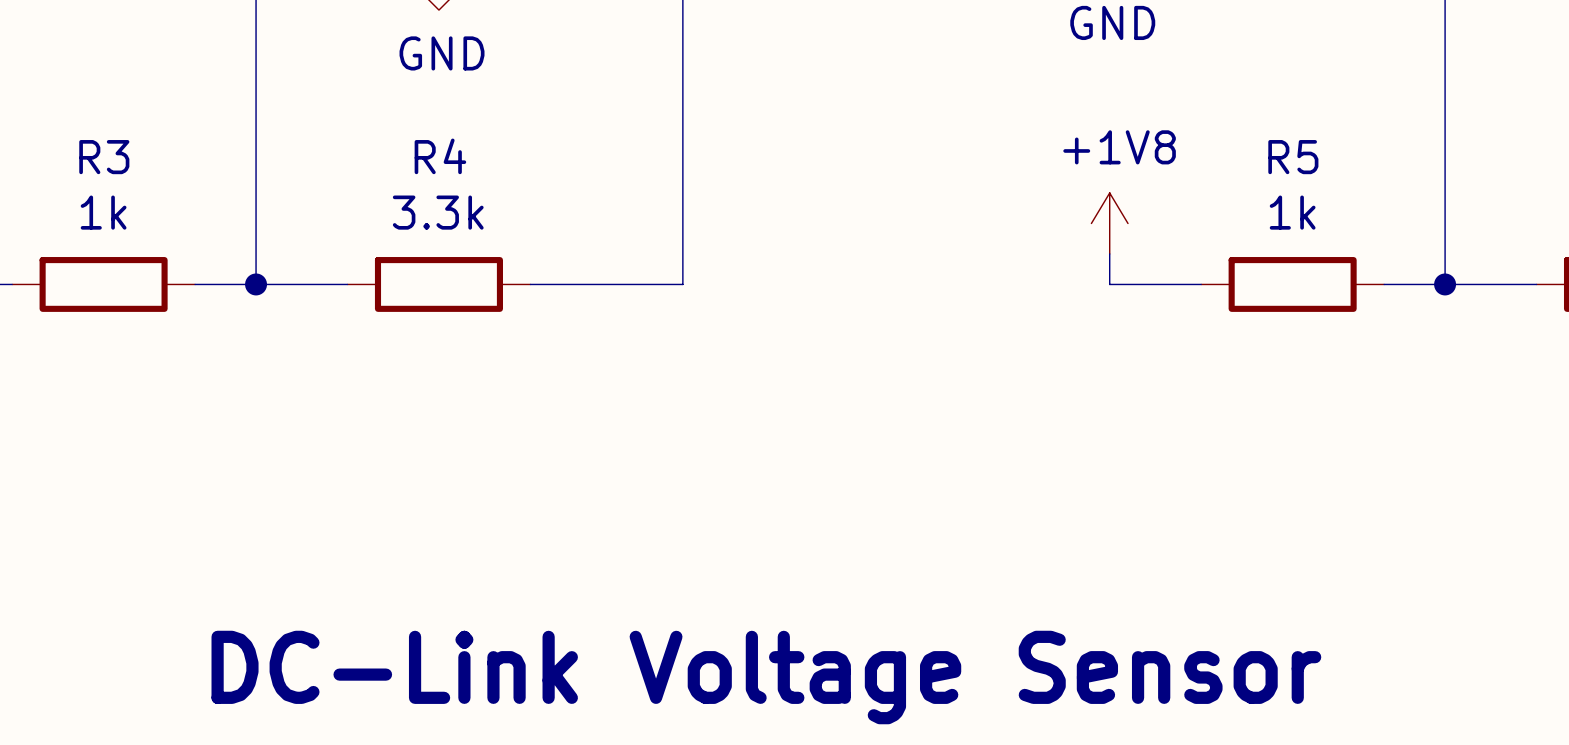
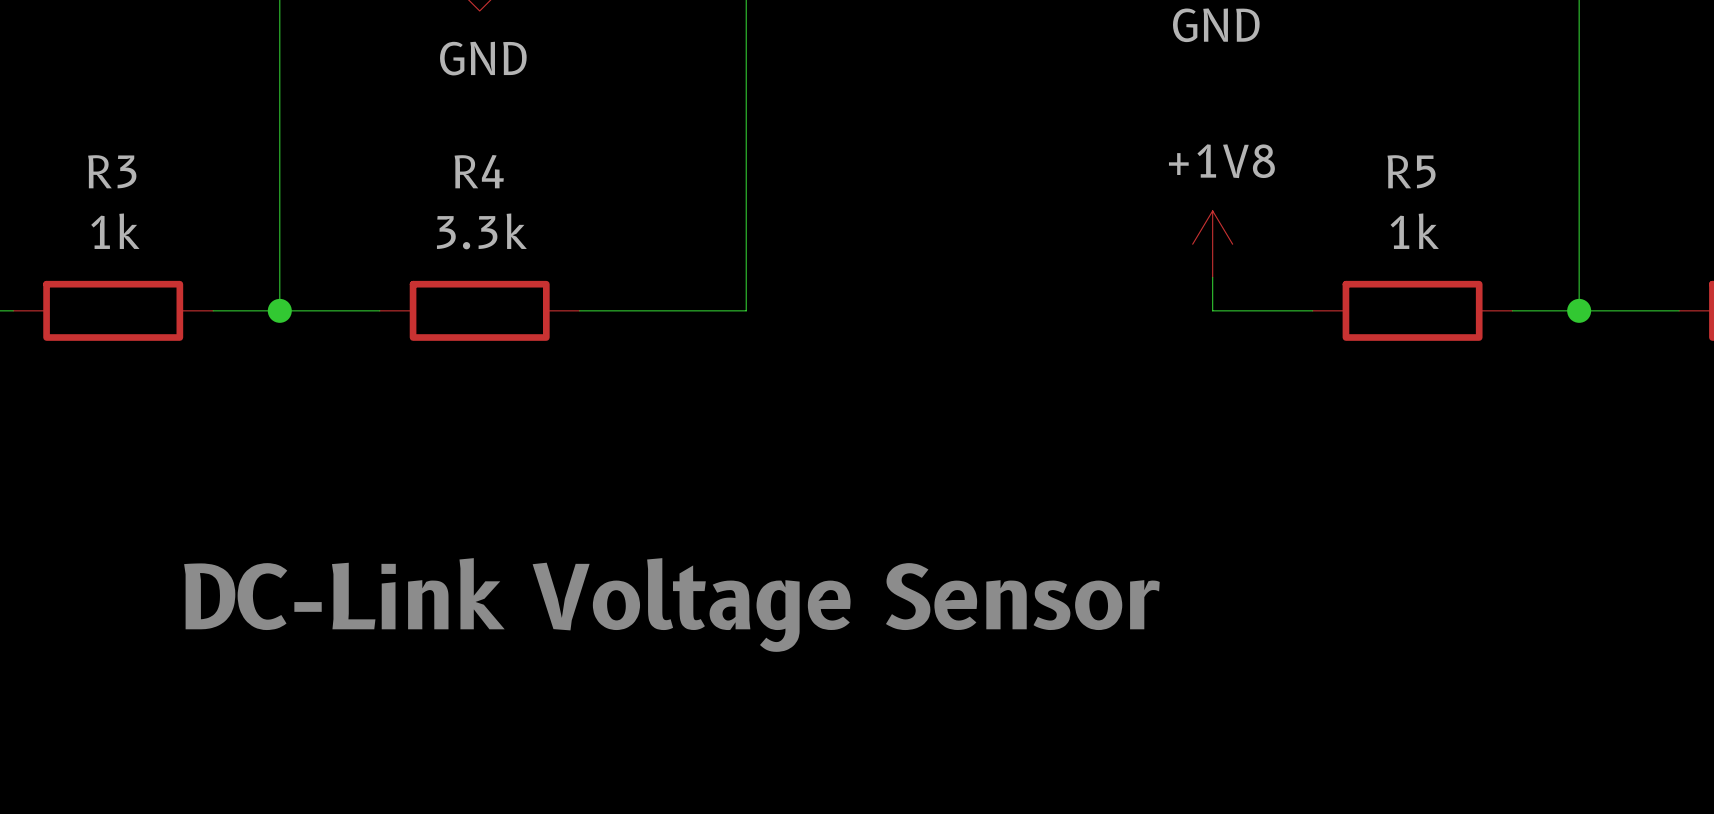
text position: DC-Link Voltage Sensor (766, 677) -> DC-Link Voltage Sensor (671, 605)

